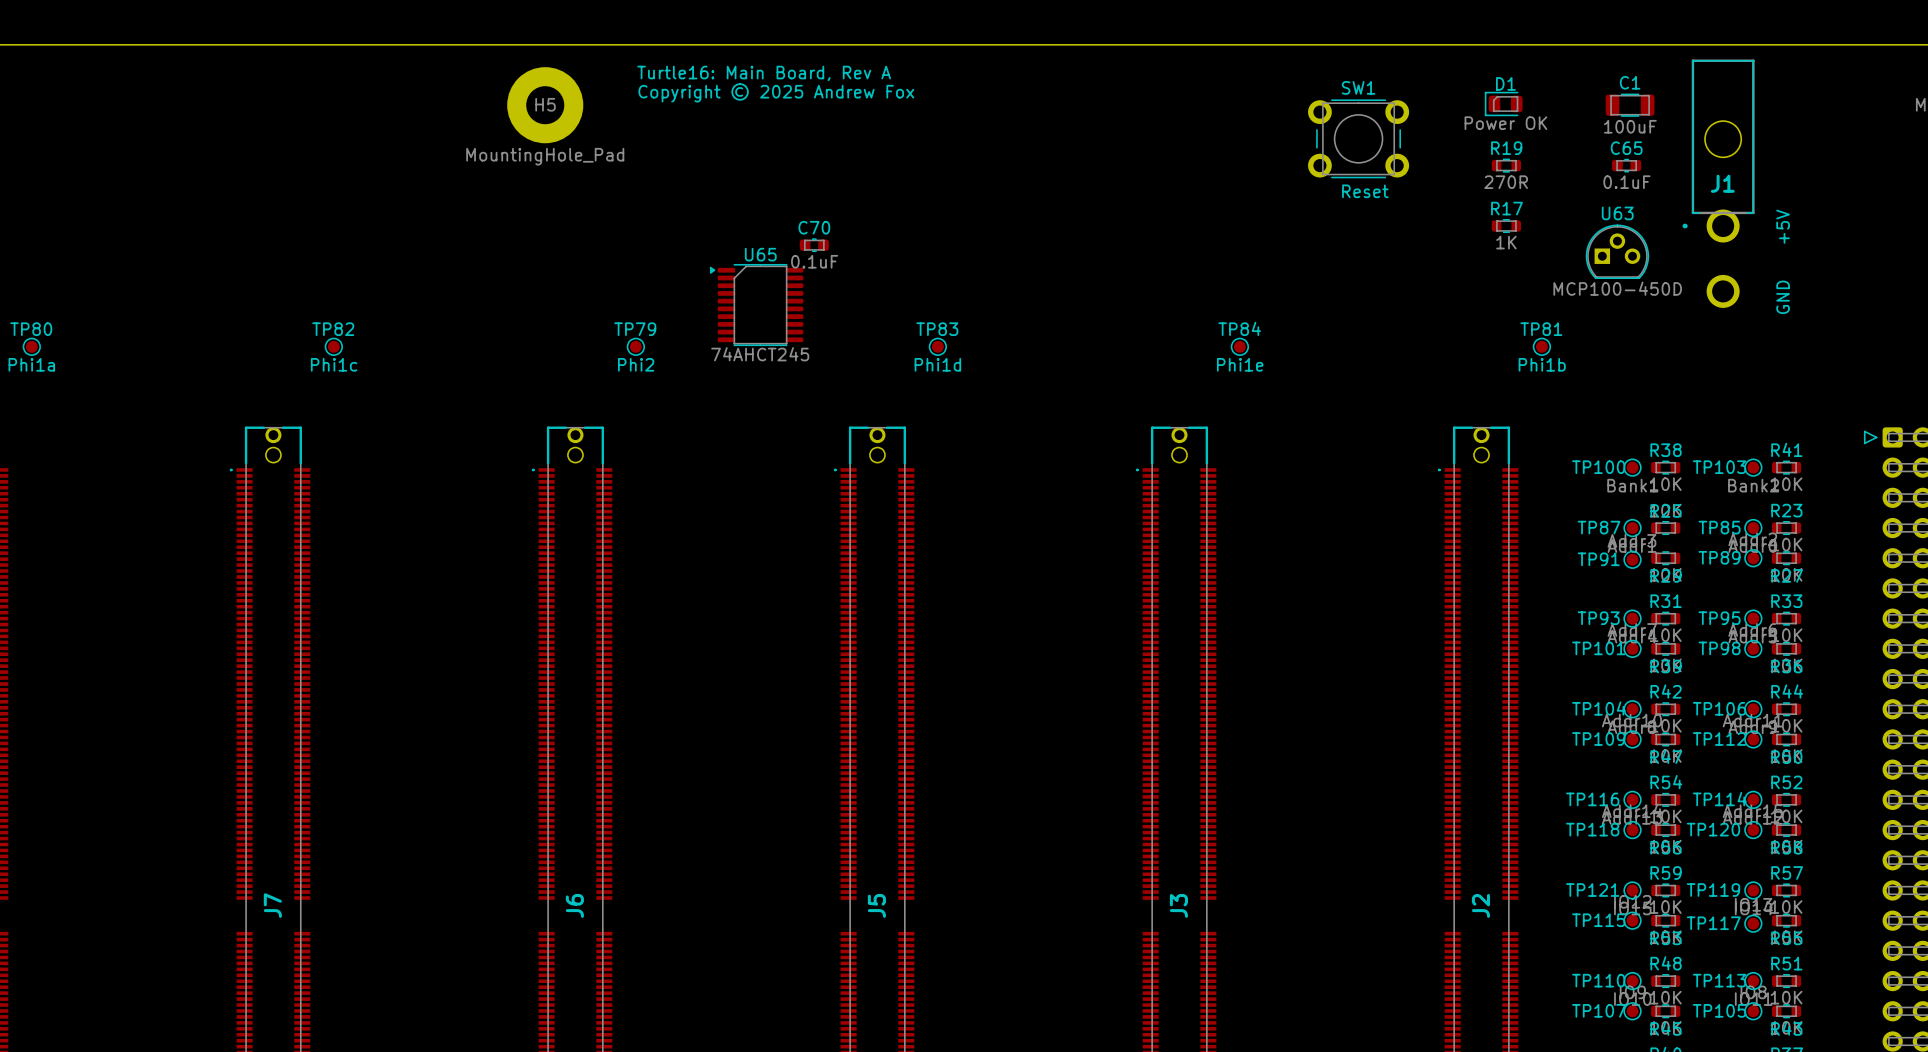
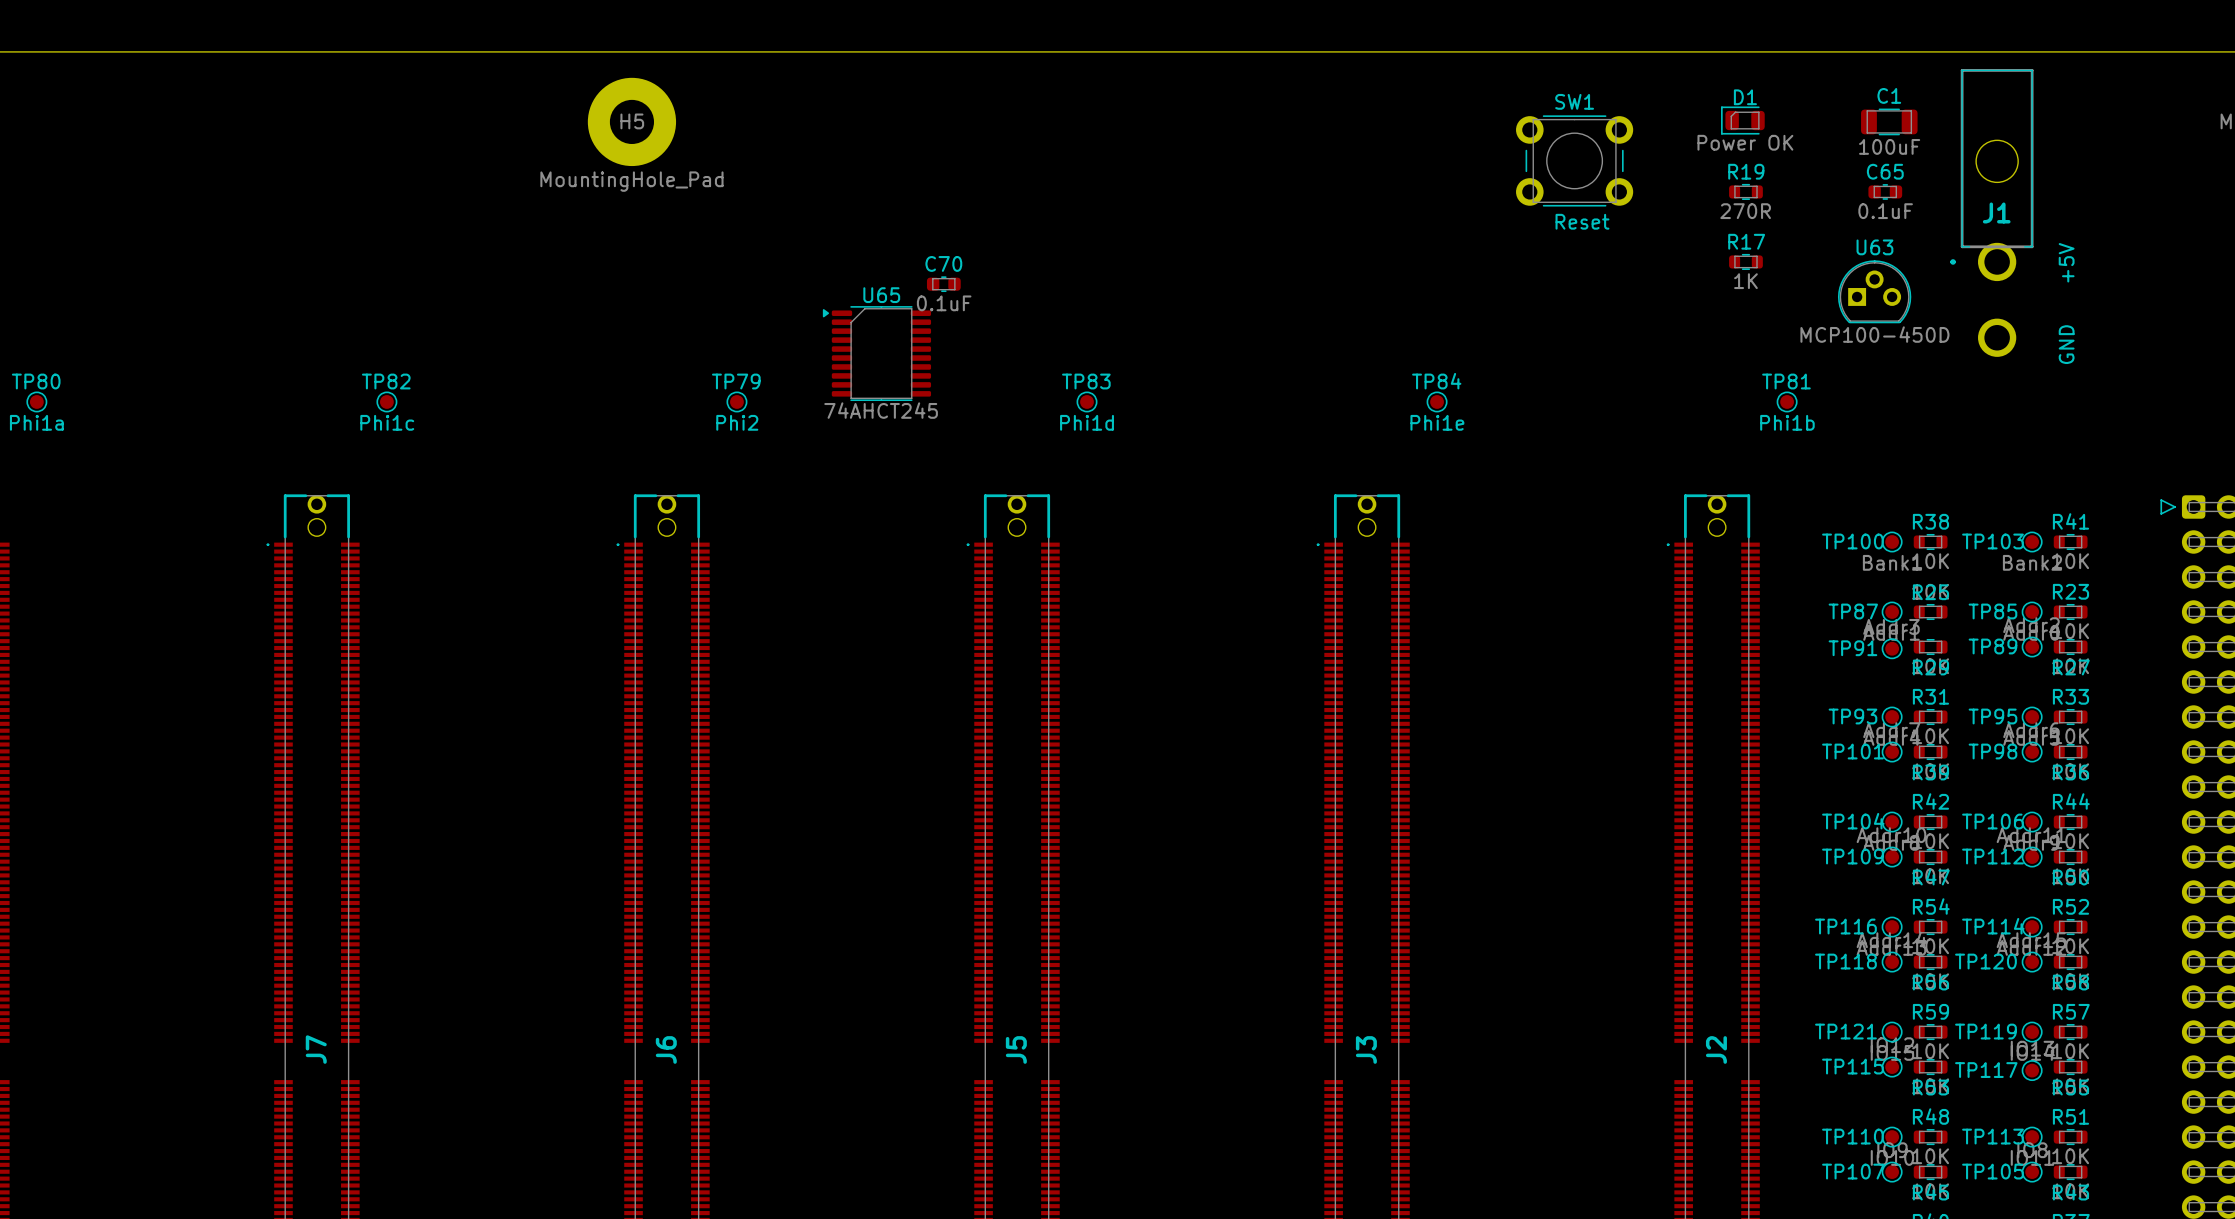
text: Turtle16: Main Board, Rev A (764, 73) -> none
text: Copyright © 2025 Andrew Fox (776, 92) -> none

